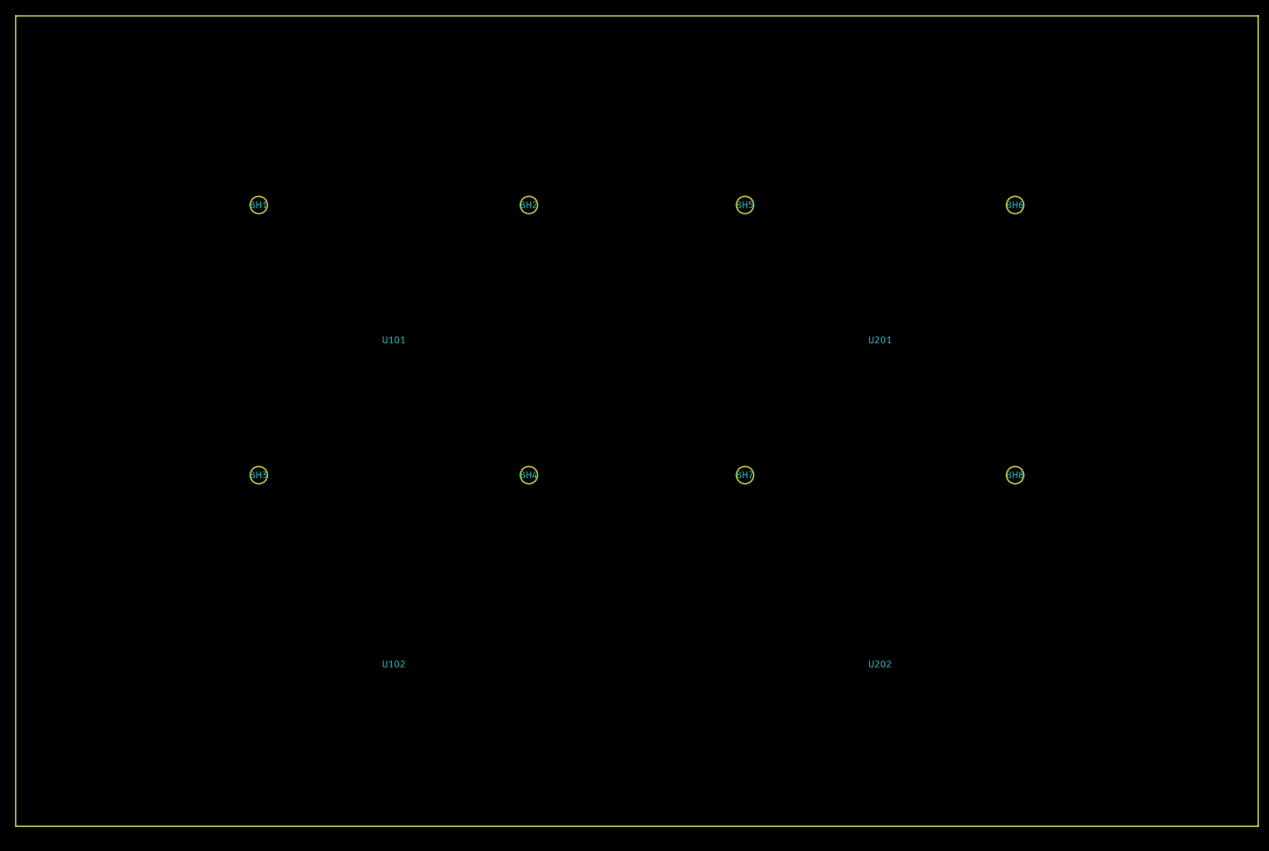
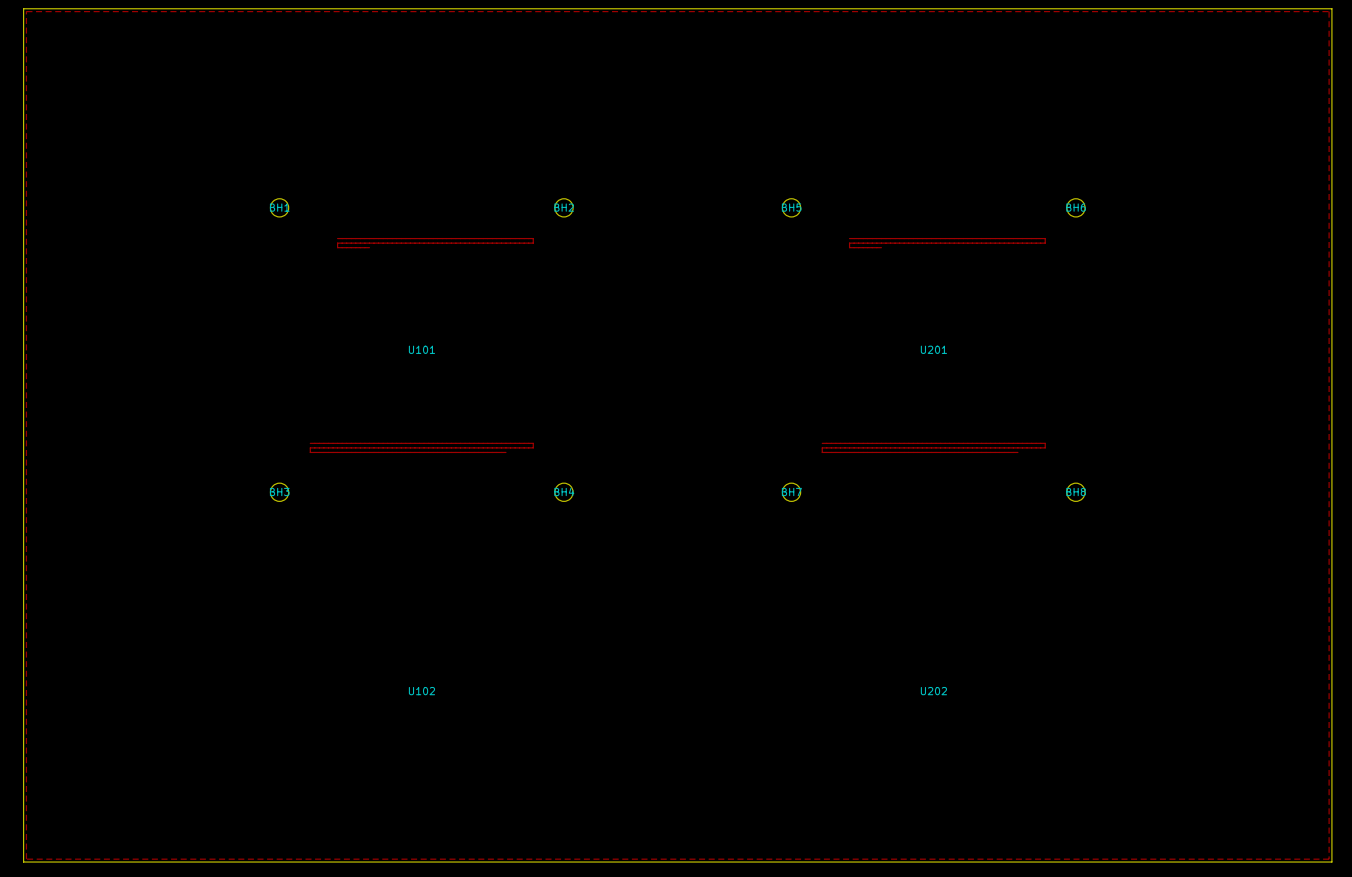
zone outline: none -> (26, 11) (1329, 11) (1329, 859) (26, 859) (26, 11)
track: none -> (337, 238) (533, 238) (533, 243) (337, 243) (337, 247) (369, 247)
track: none -> (849, 238) (1045, 238) (1045, 243) (849, 243) (849, 247) (881, 247)
track: none -> (310, 443) (533, 443) (533, 447) (310, 447) (310, 452) (505, 452)
track: none -> (822, 443) (1045, 443) (1045, 447) (822, 447) (822, 452) (1017, 452)

